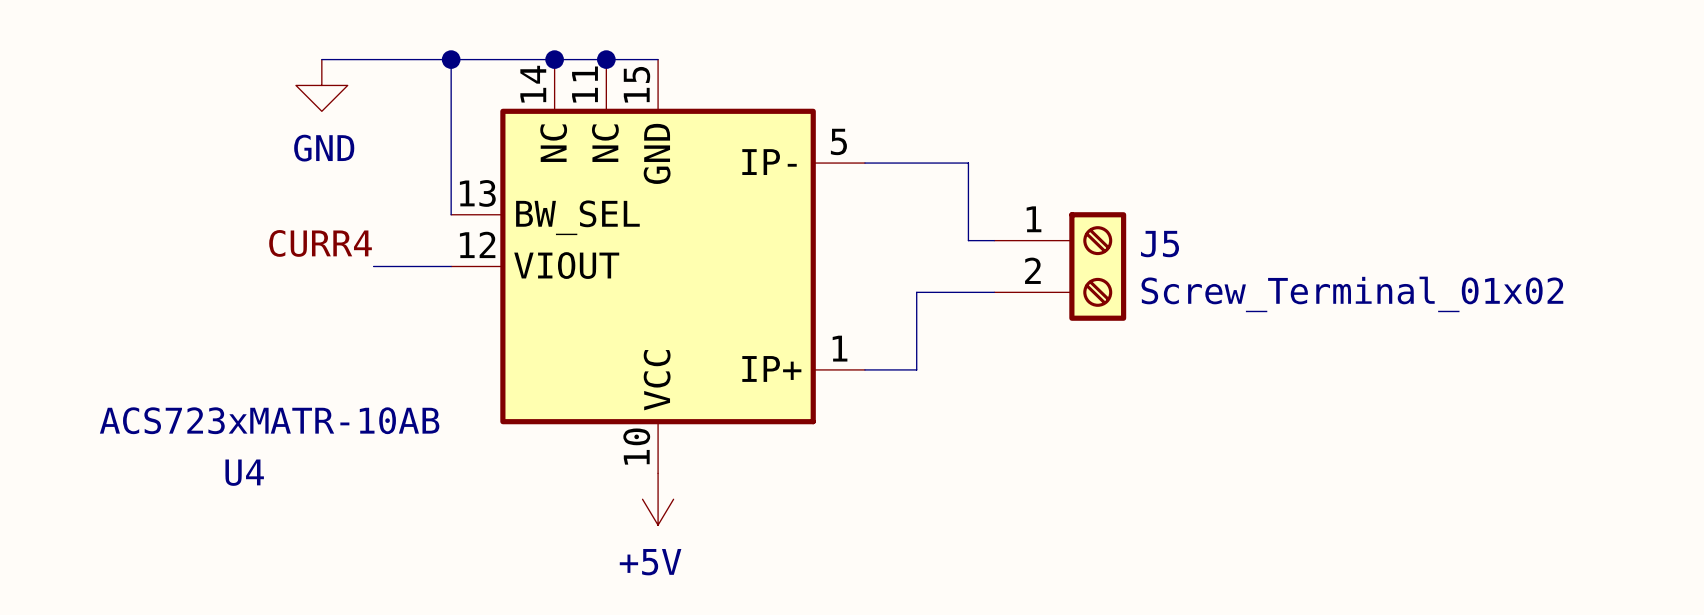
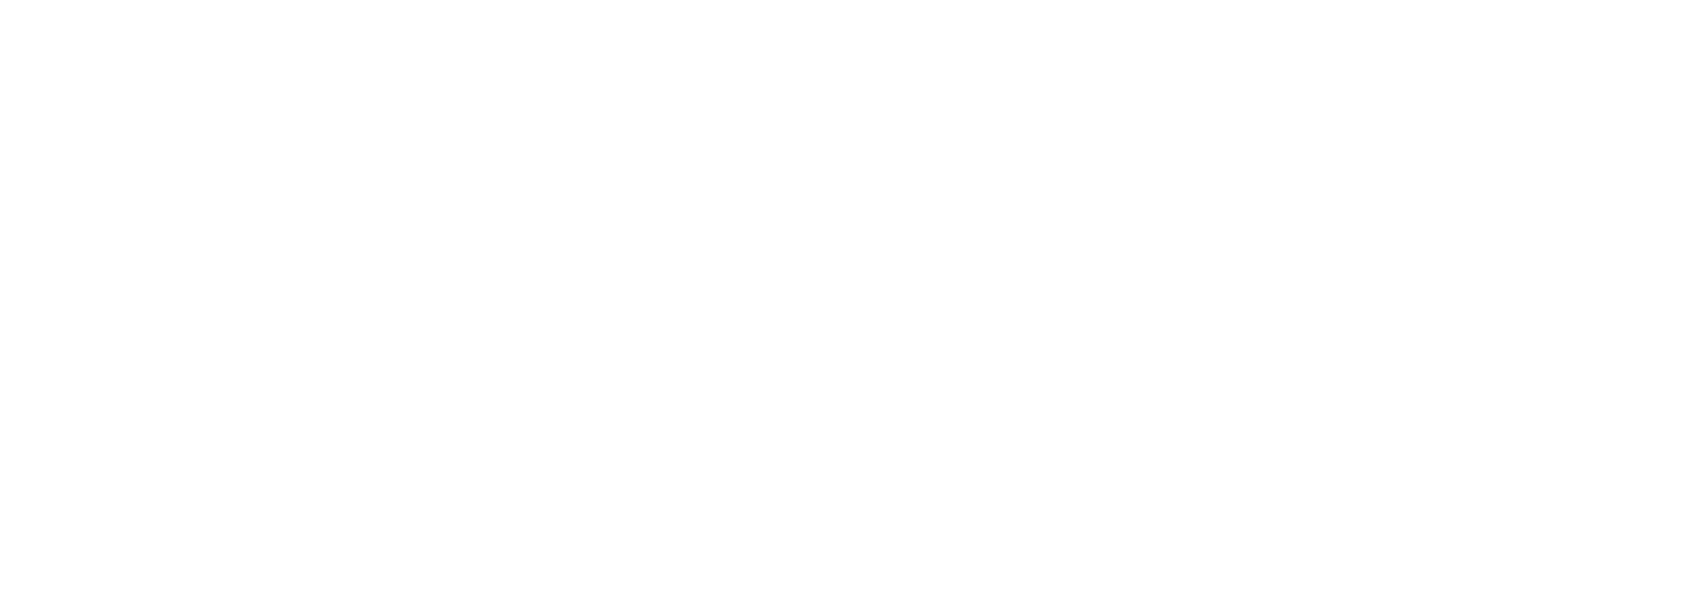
wire: (321, 59) (658, 59) -> none
wire: (451, 59) (451, 214) -> none
junction: (451, 59) -> none
junction: (554, 59) -> none
junction: (606, 59) -> none
power symbol: GND (321, 85) -> none
wire: (864, 163) (968, 163) (968, 240) (994, 240) -> none
label: CURR4 (320, 243) -> none
wire: (373, 266) (451, 266) -> none
U4: ACS723xMATR-10AB (658, 266) -> none
J5: Screw_Terminal_01x02 (1060, 266) -> none
wire: (994, 292) (916, 292) (916, 369) (864, 369) -> none
power symbol: +5V (658, 499) -> none

